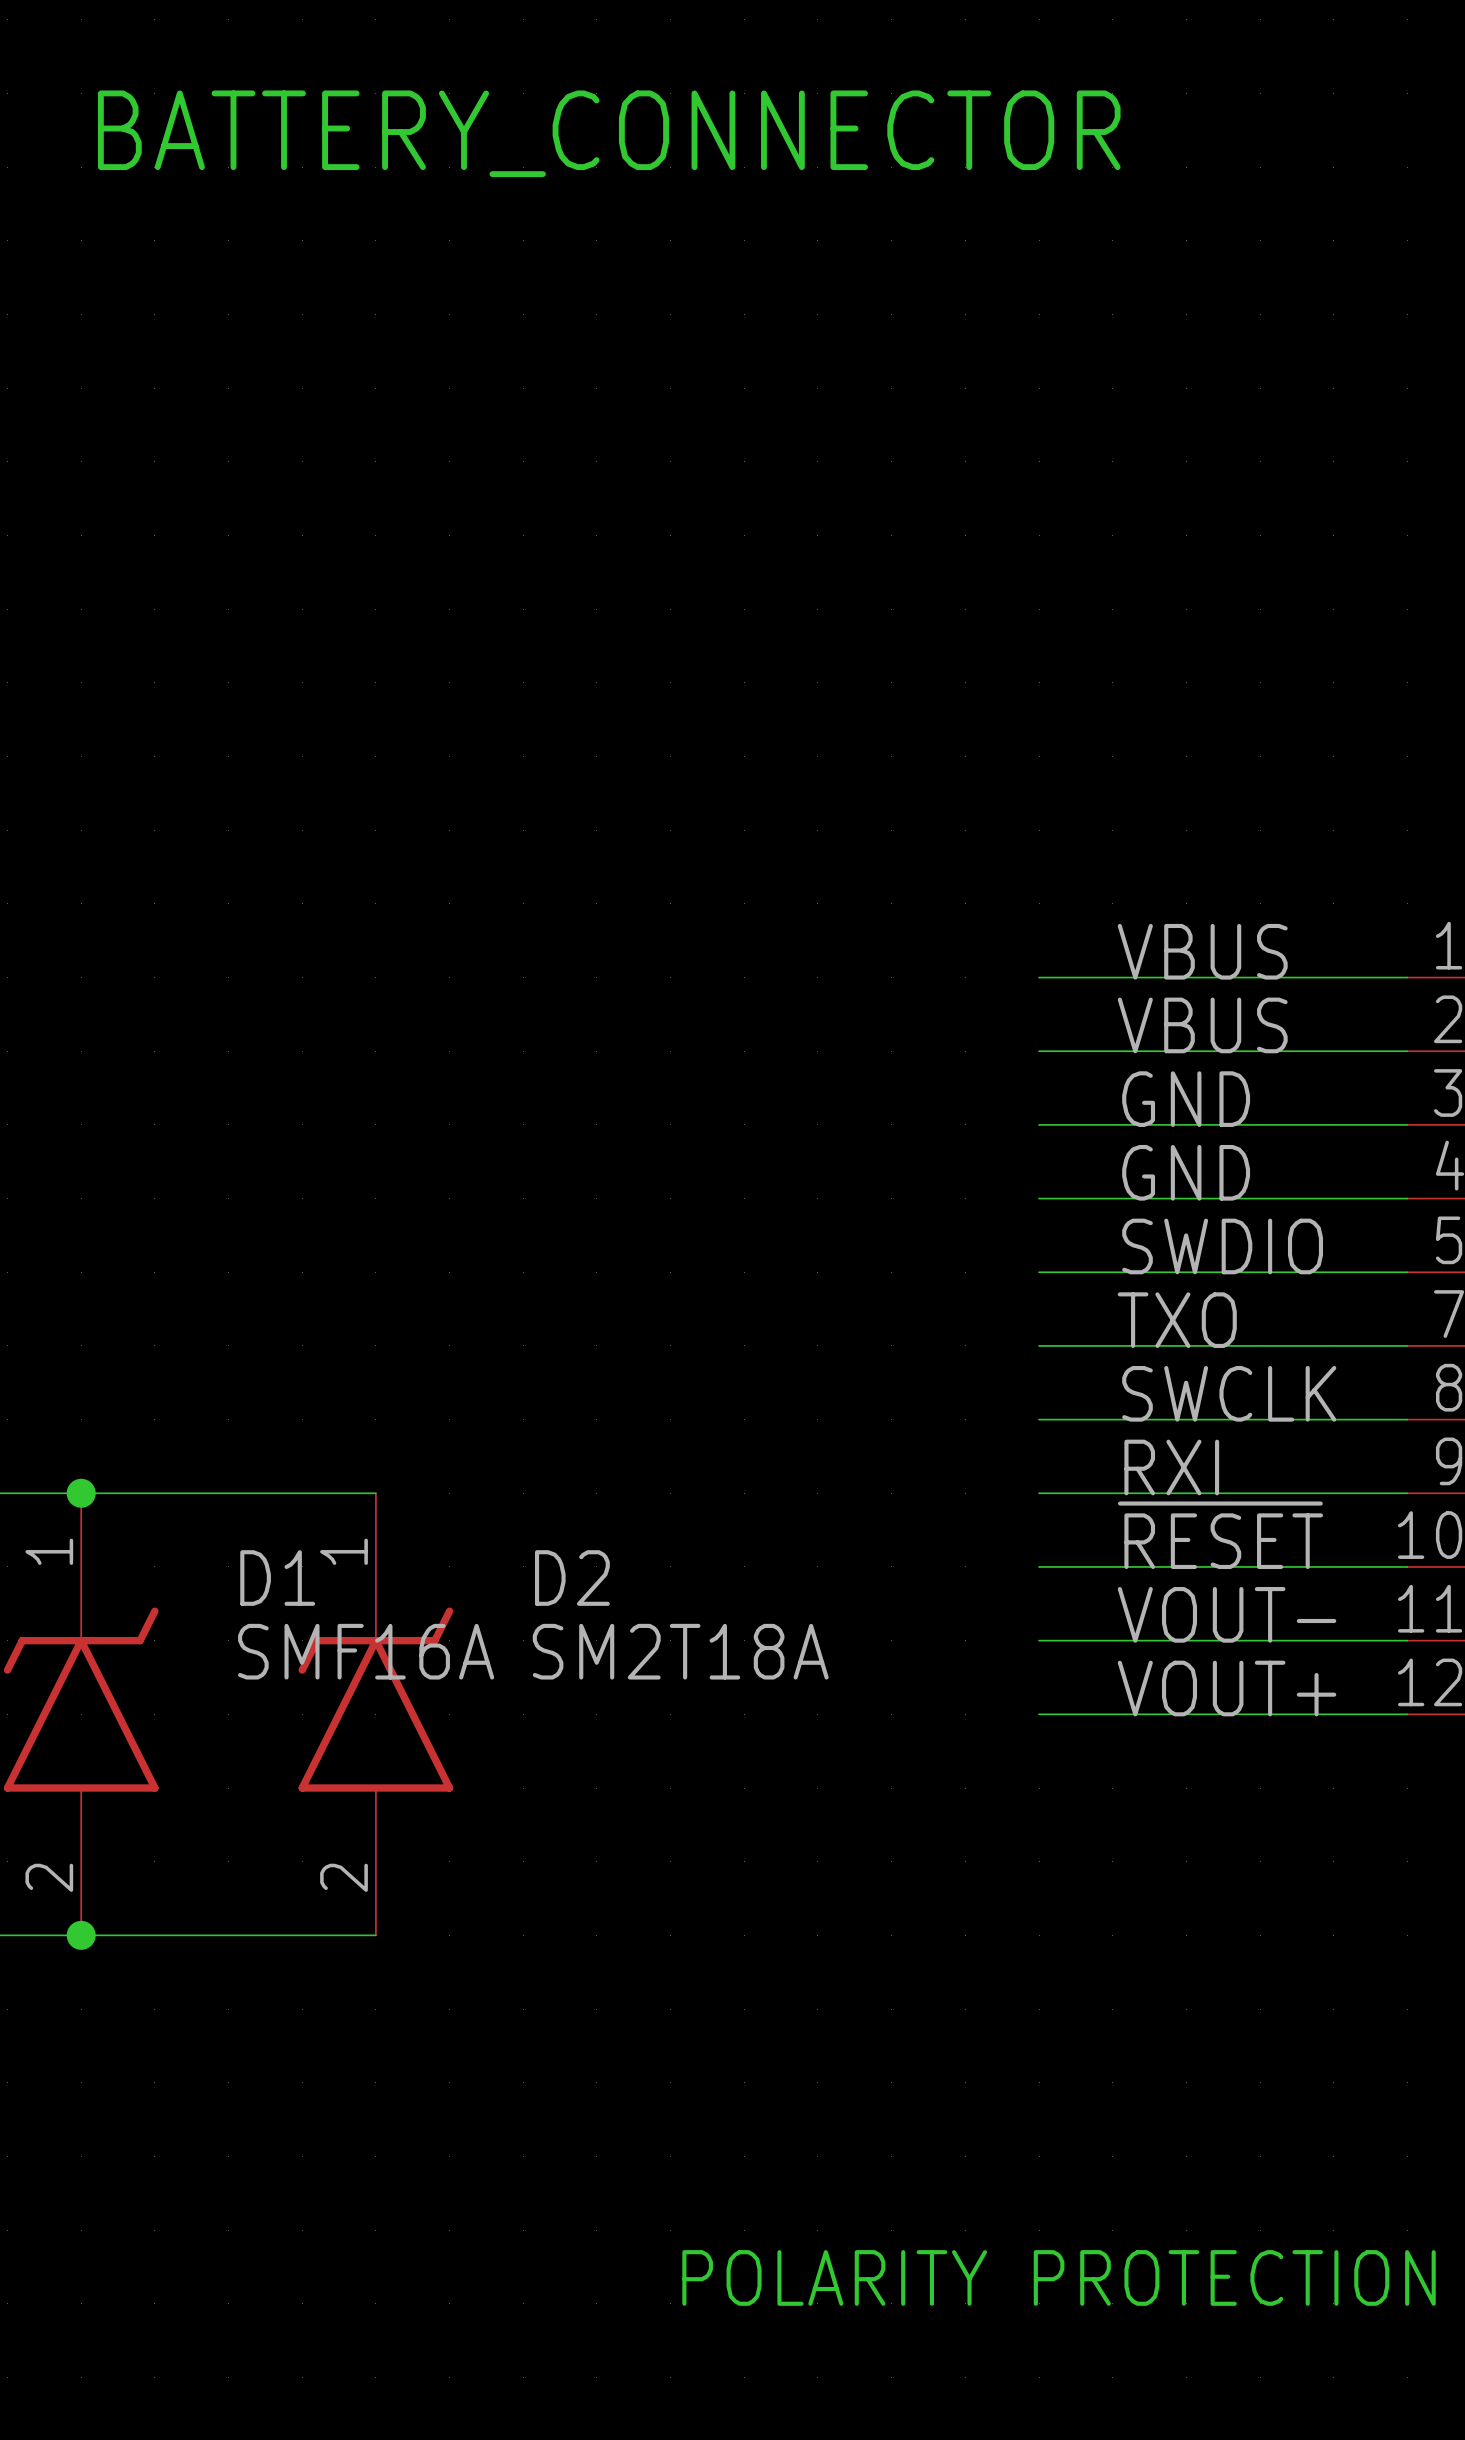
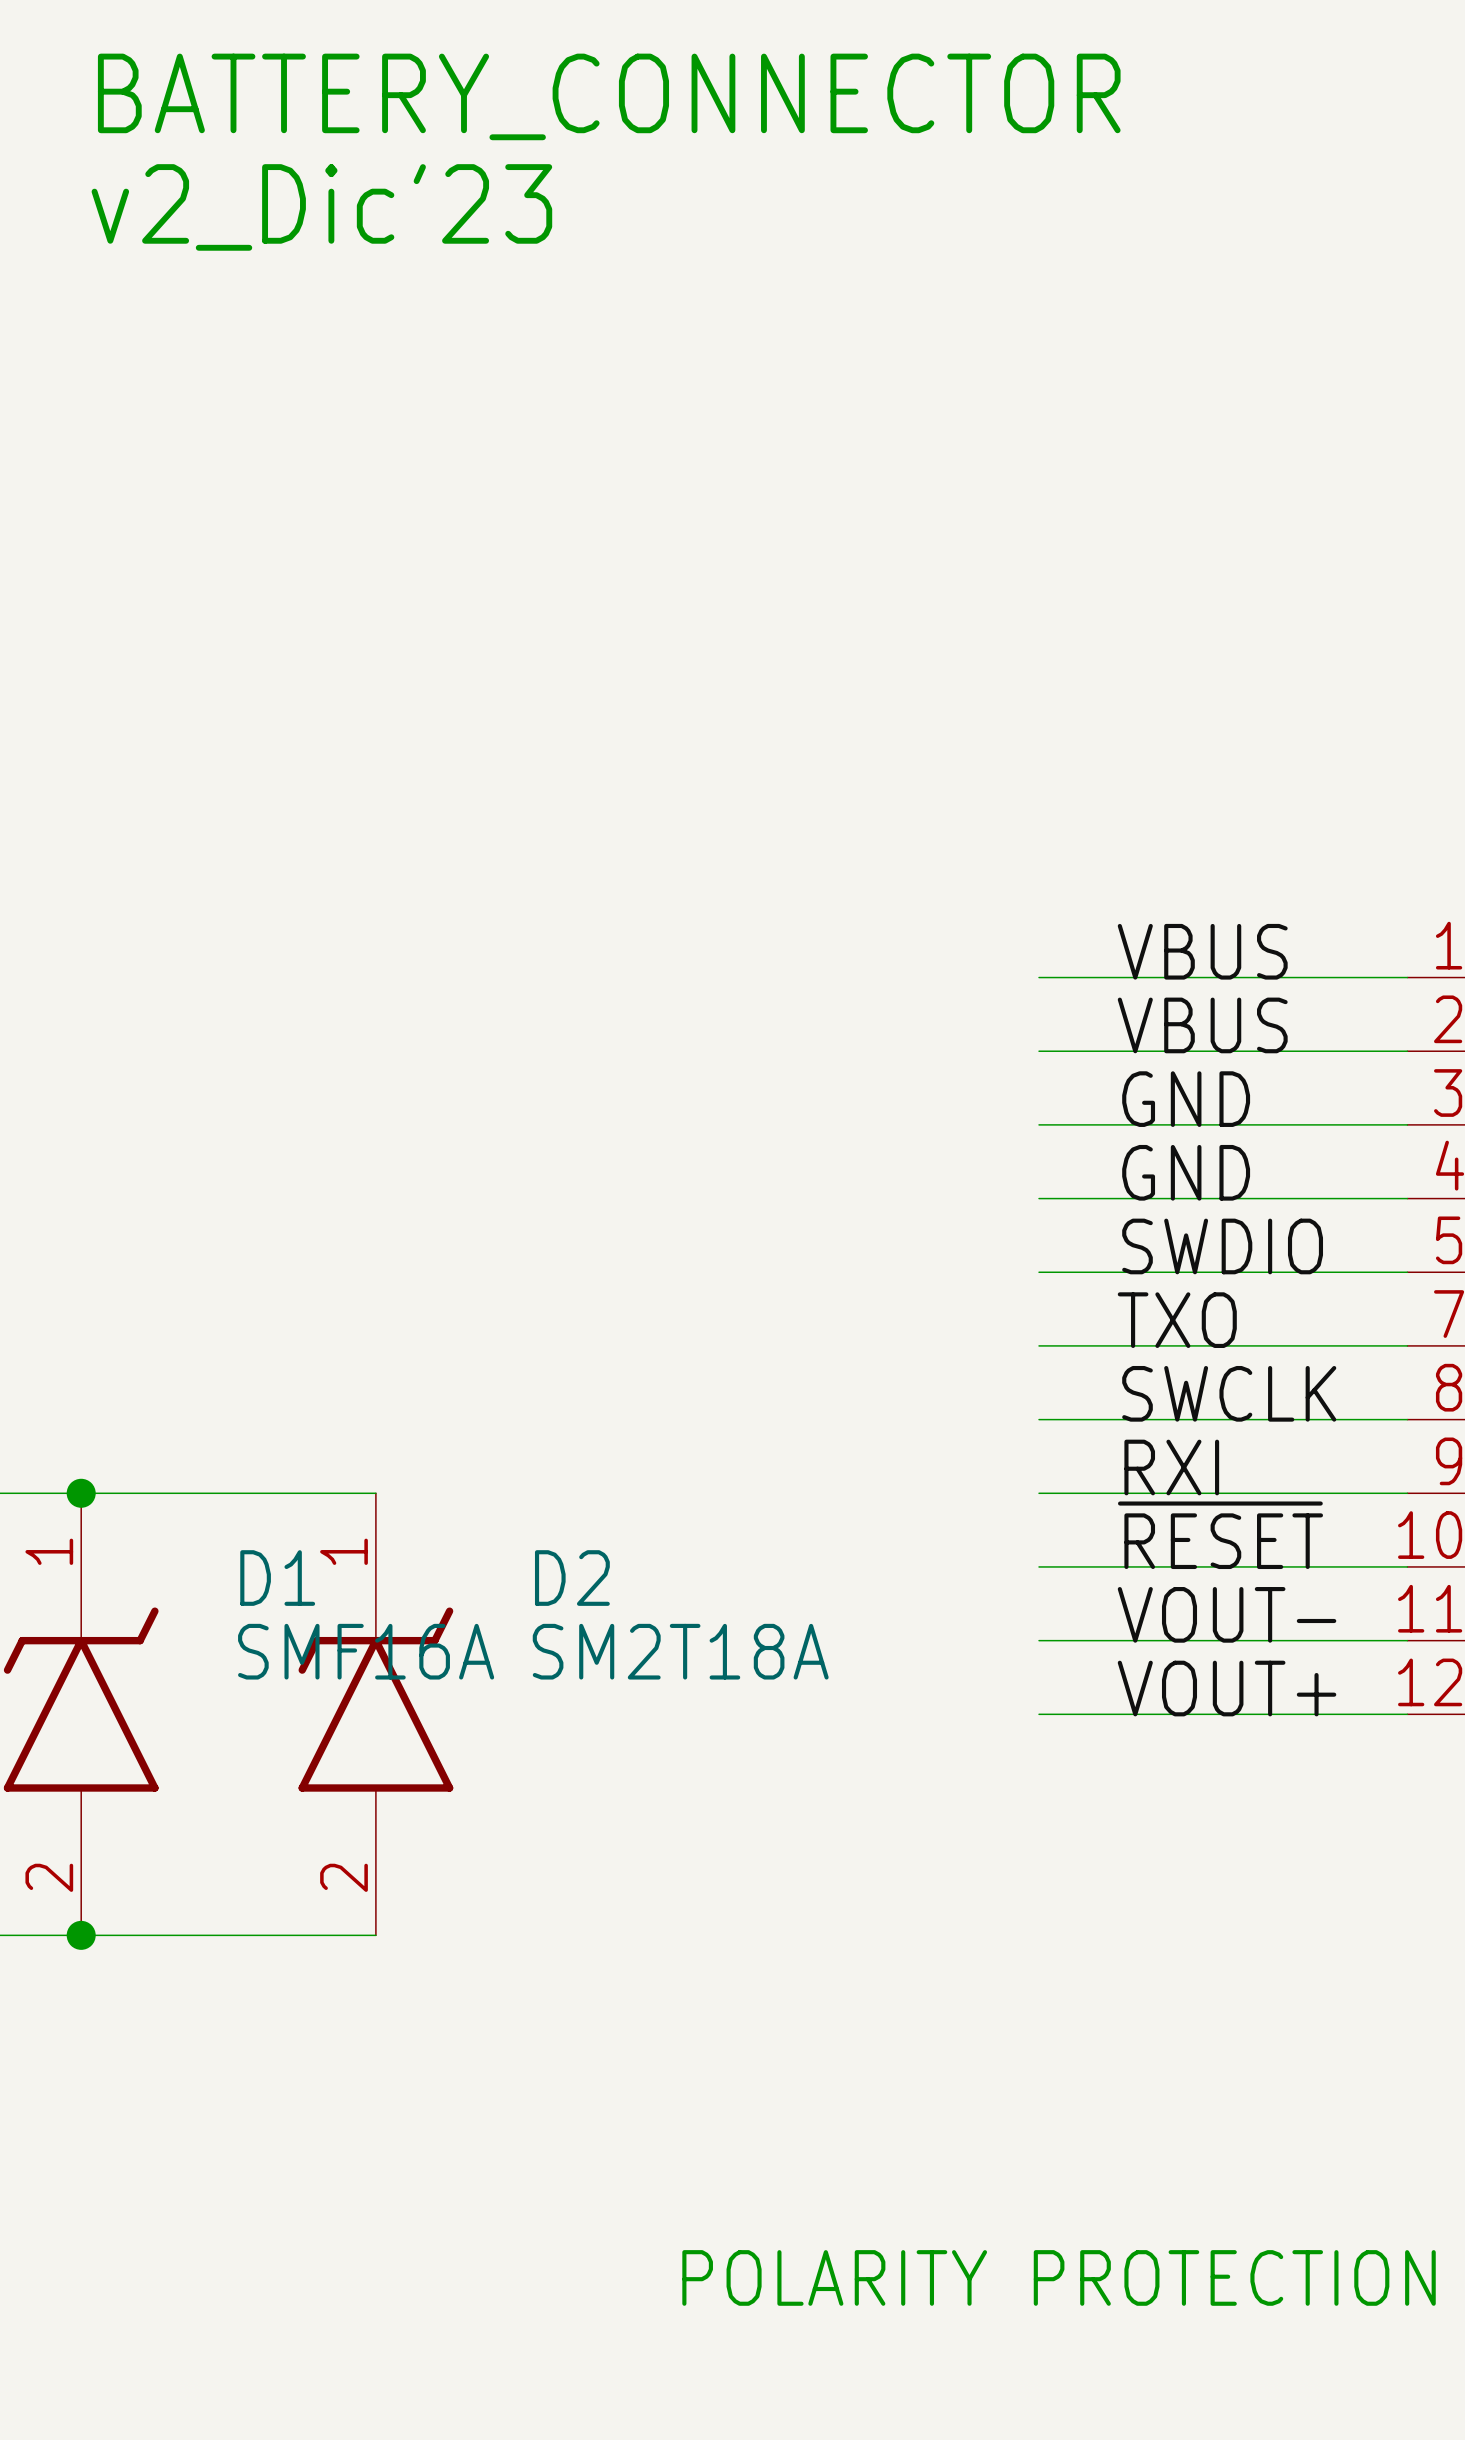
text position: BATTERY_CONNECTOR (609, 133) -> BATTERY_CONNECTOR (609, 96)
text: none -> v2_Dic'23 (321, 207)

